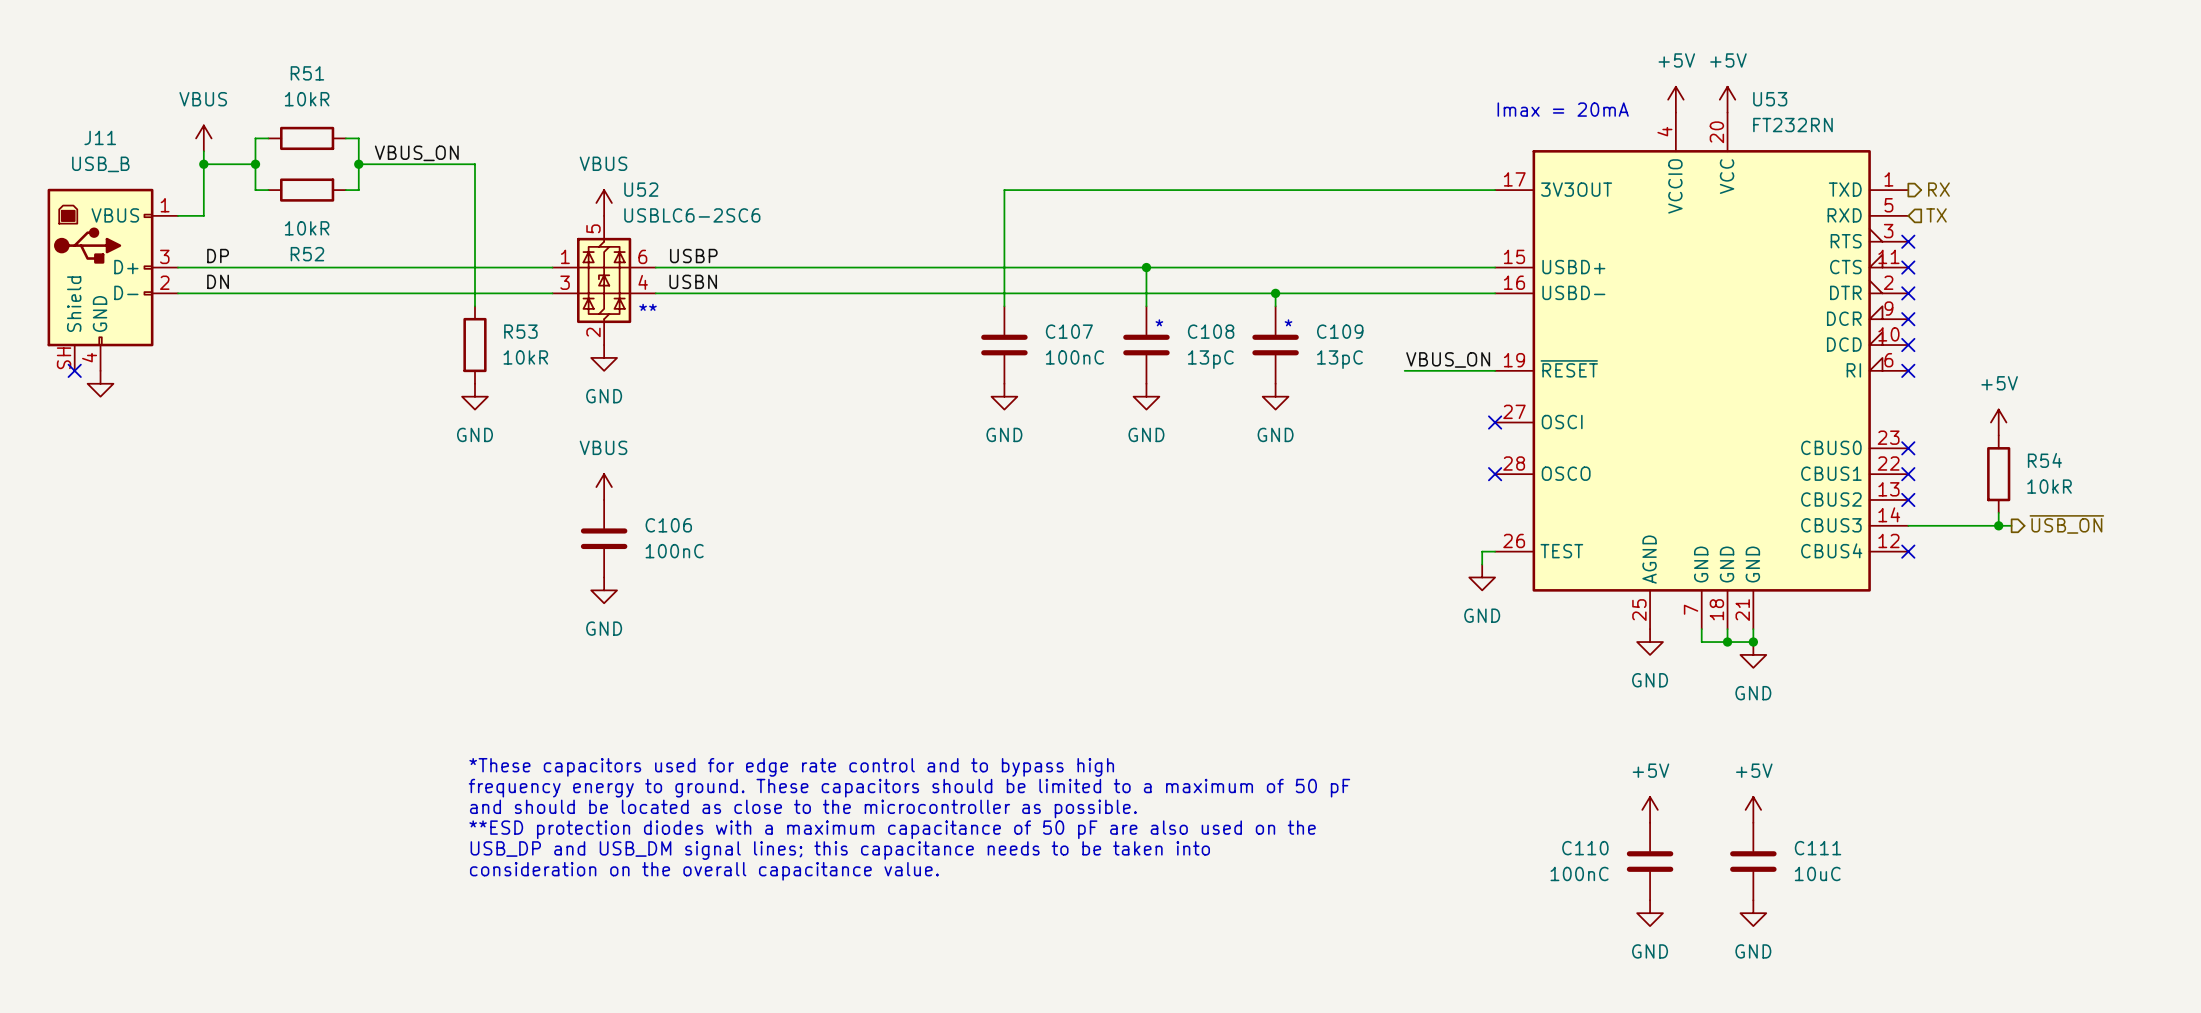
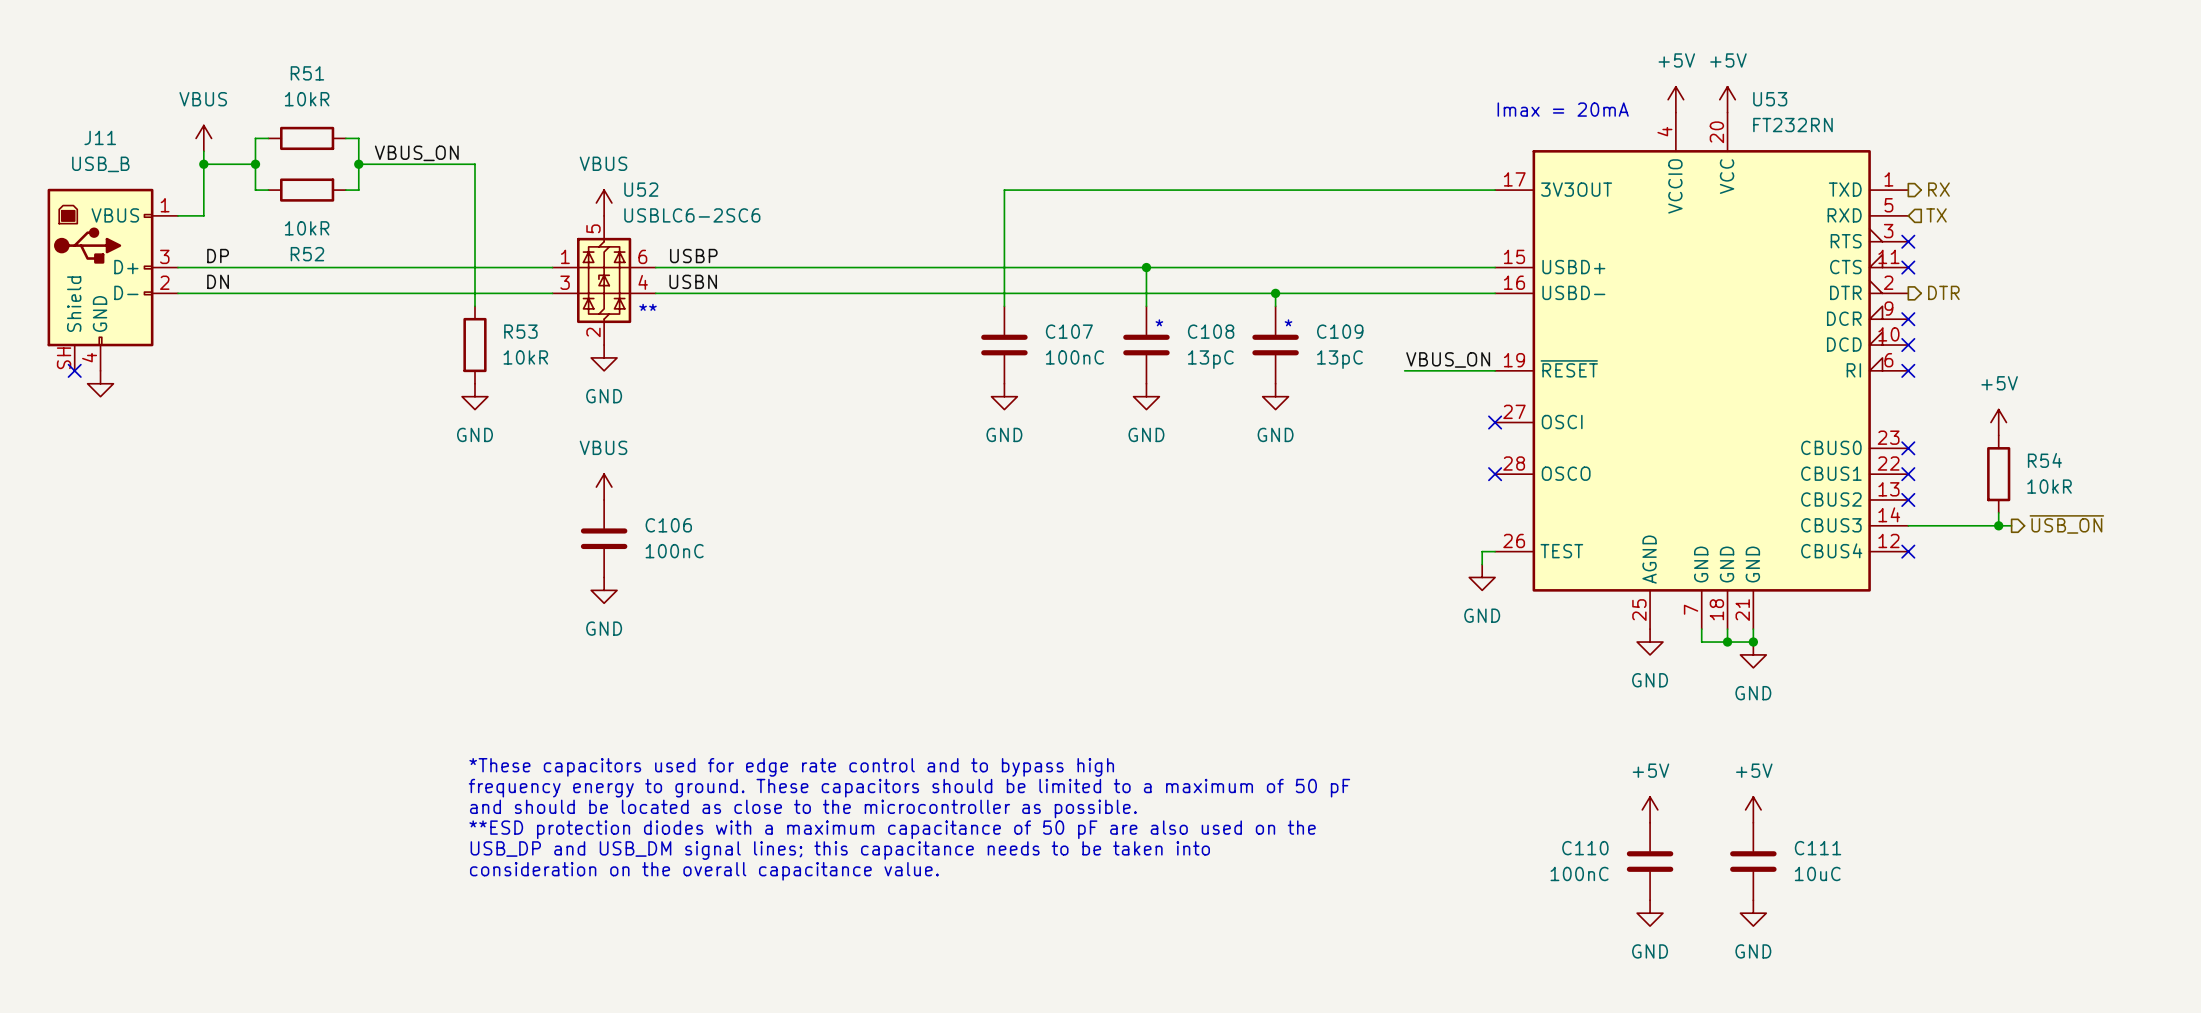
hierarchical label: none -> DTR (1943, 292)
no-connect mark: (1908, 293) -> none

